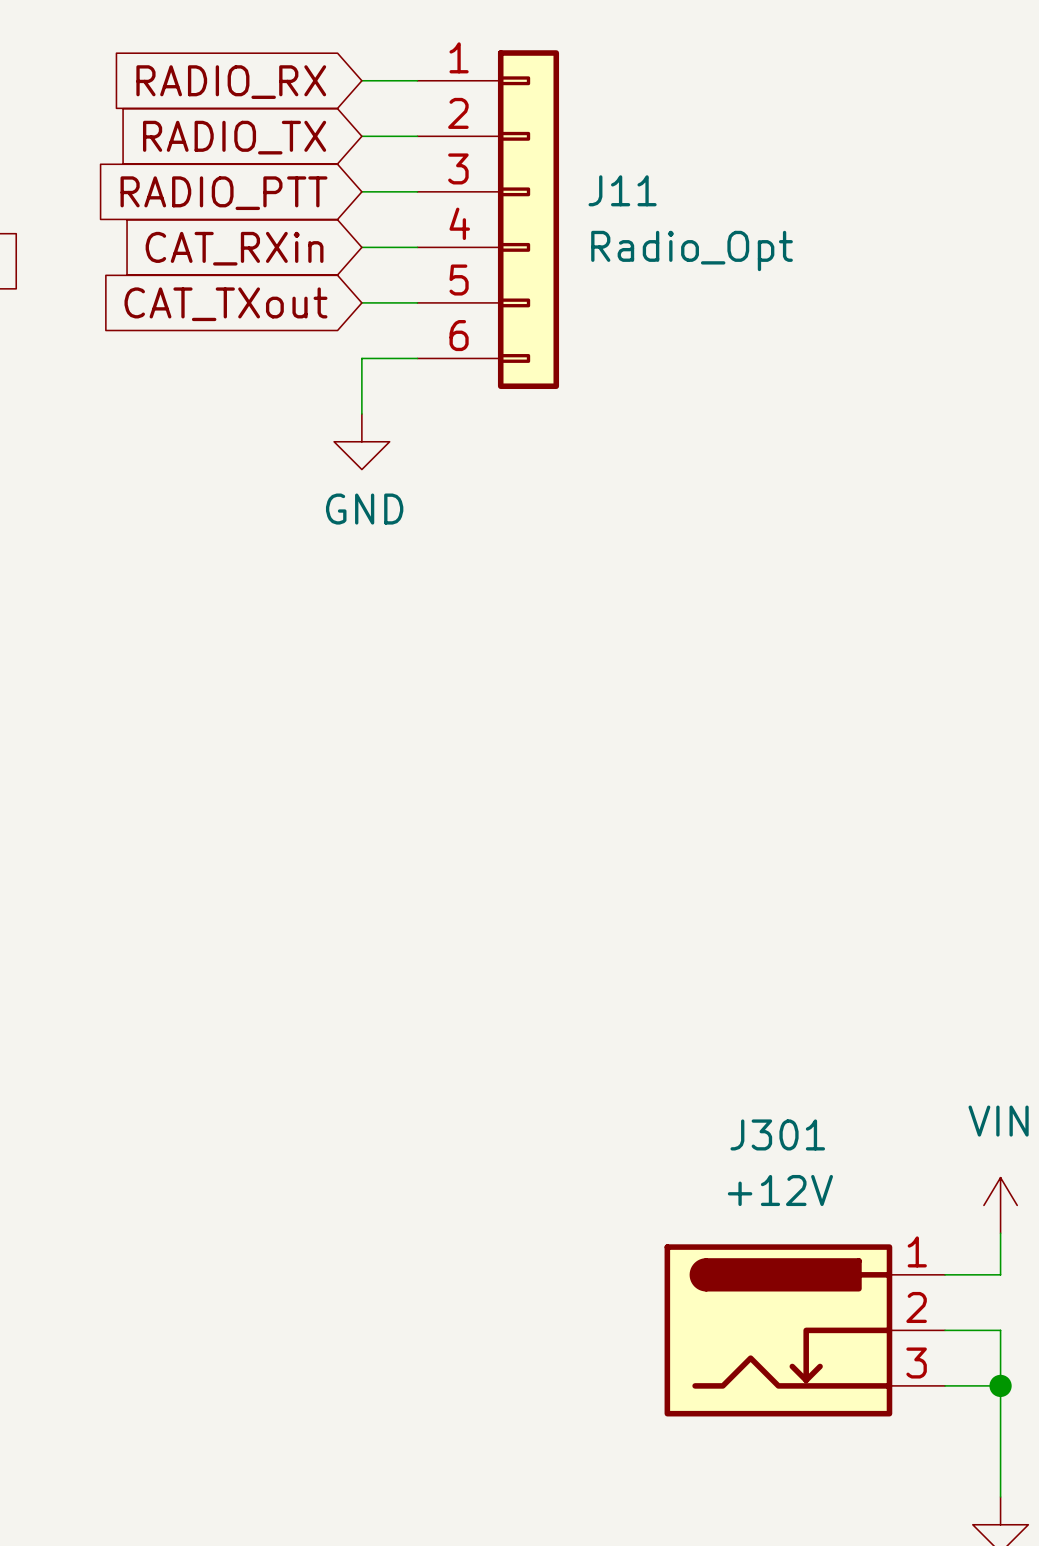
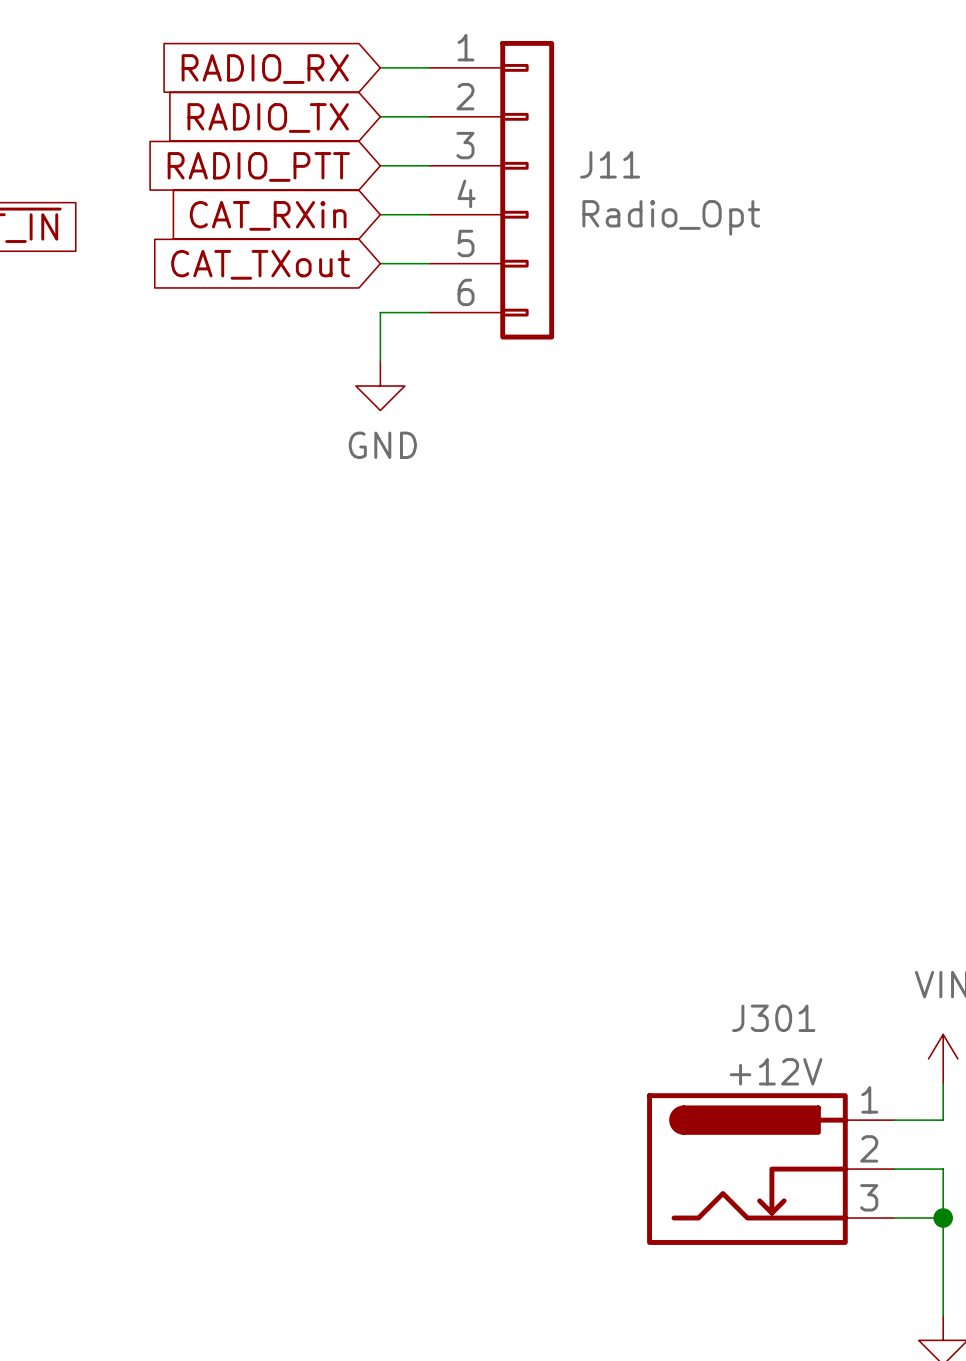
J301 name position: J301 (777, 1134) -> J301 (773, 1018)
J301 value position: +12V (780, 1190) -> +12V (776, 1071)

